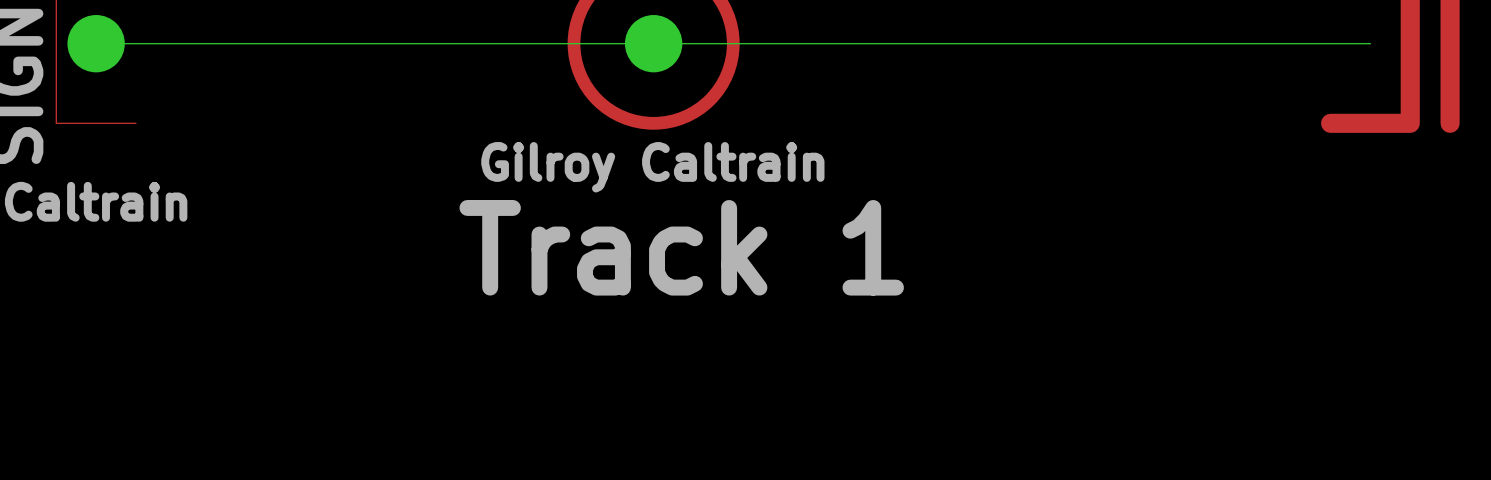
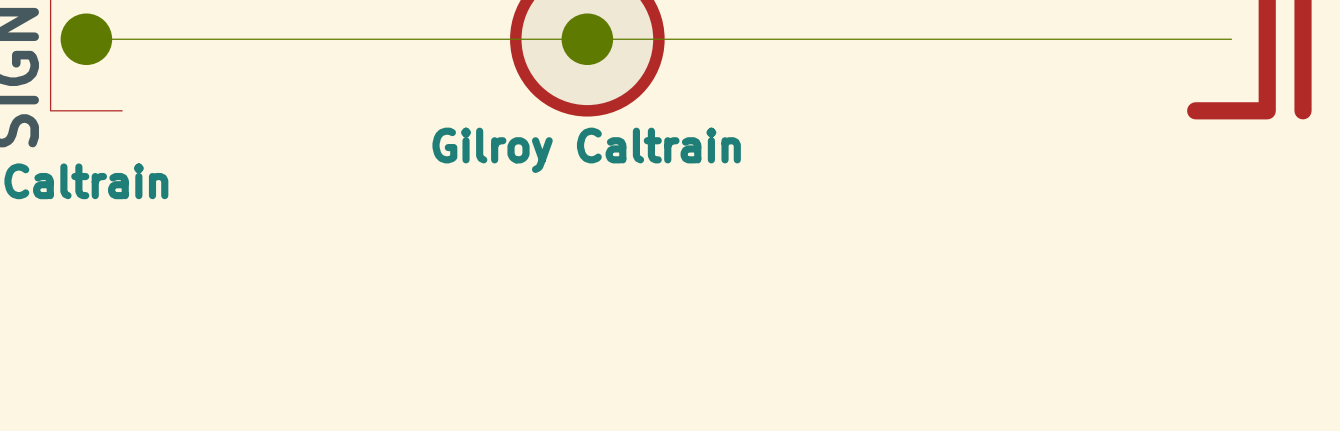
part value: Track 1 (681, 247) -> none

